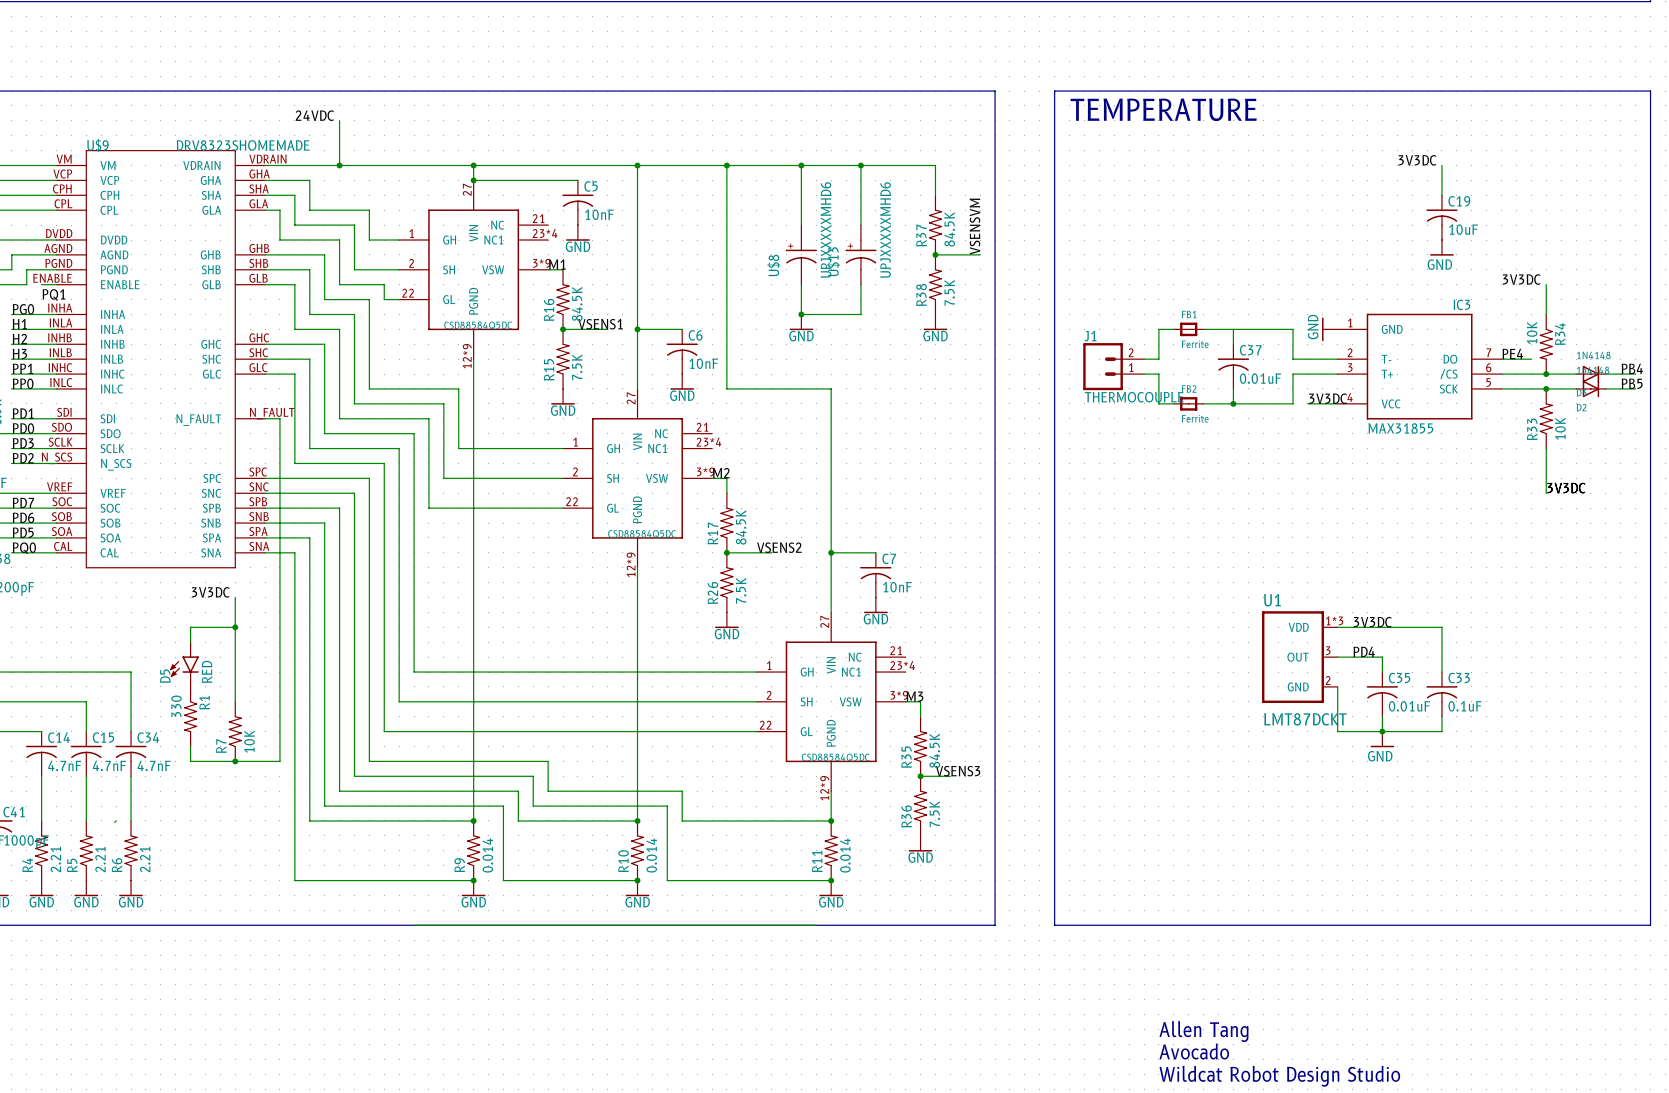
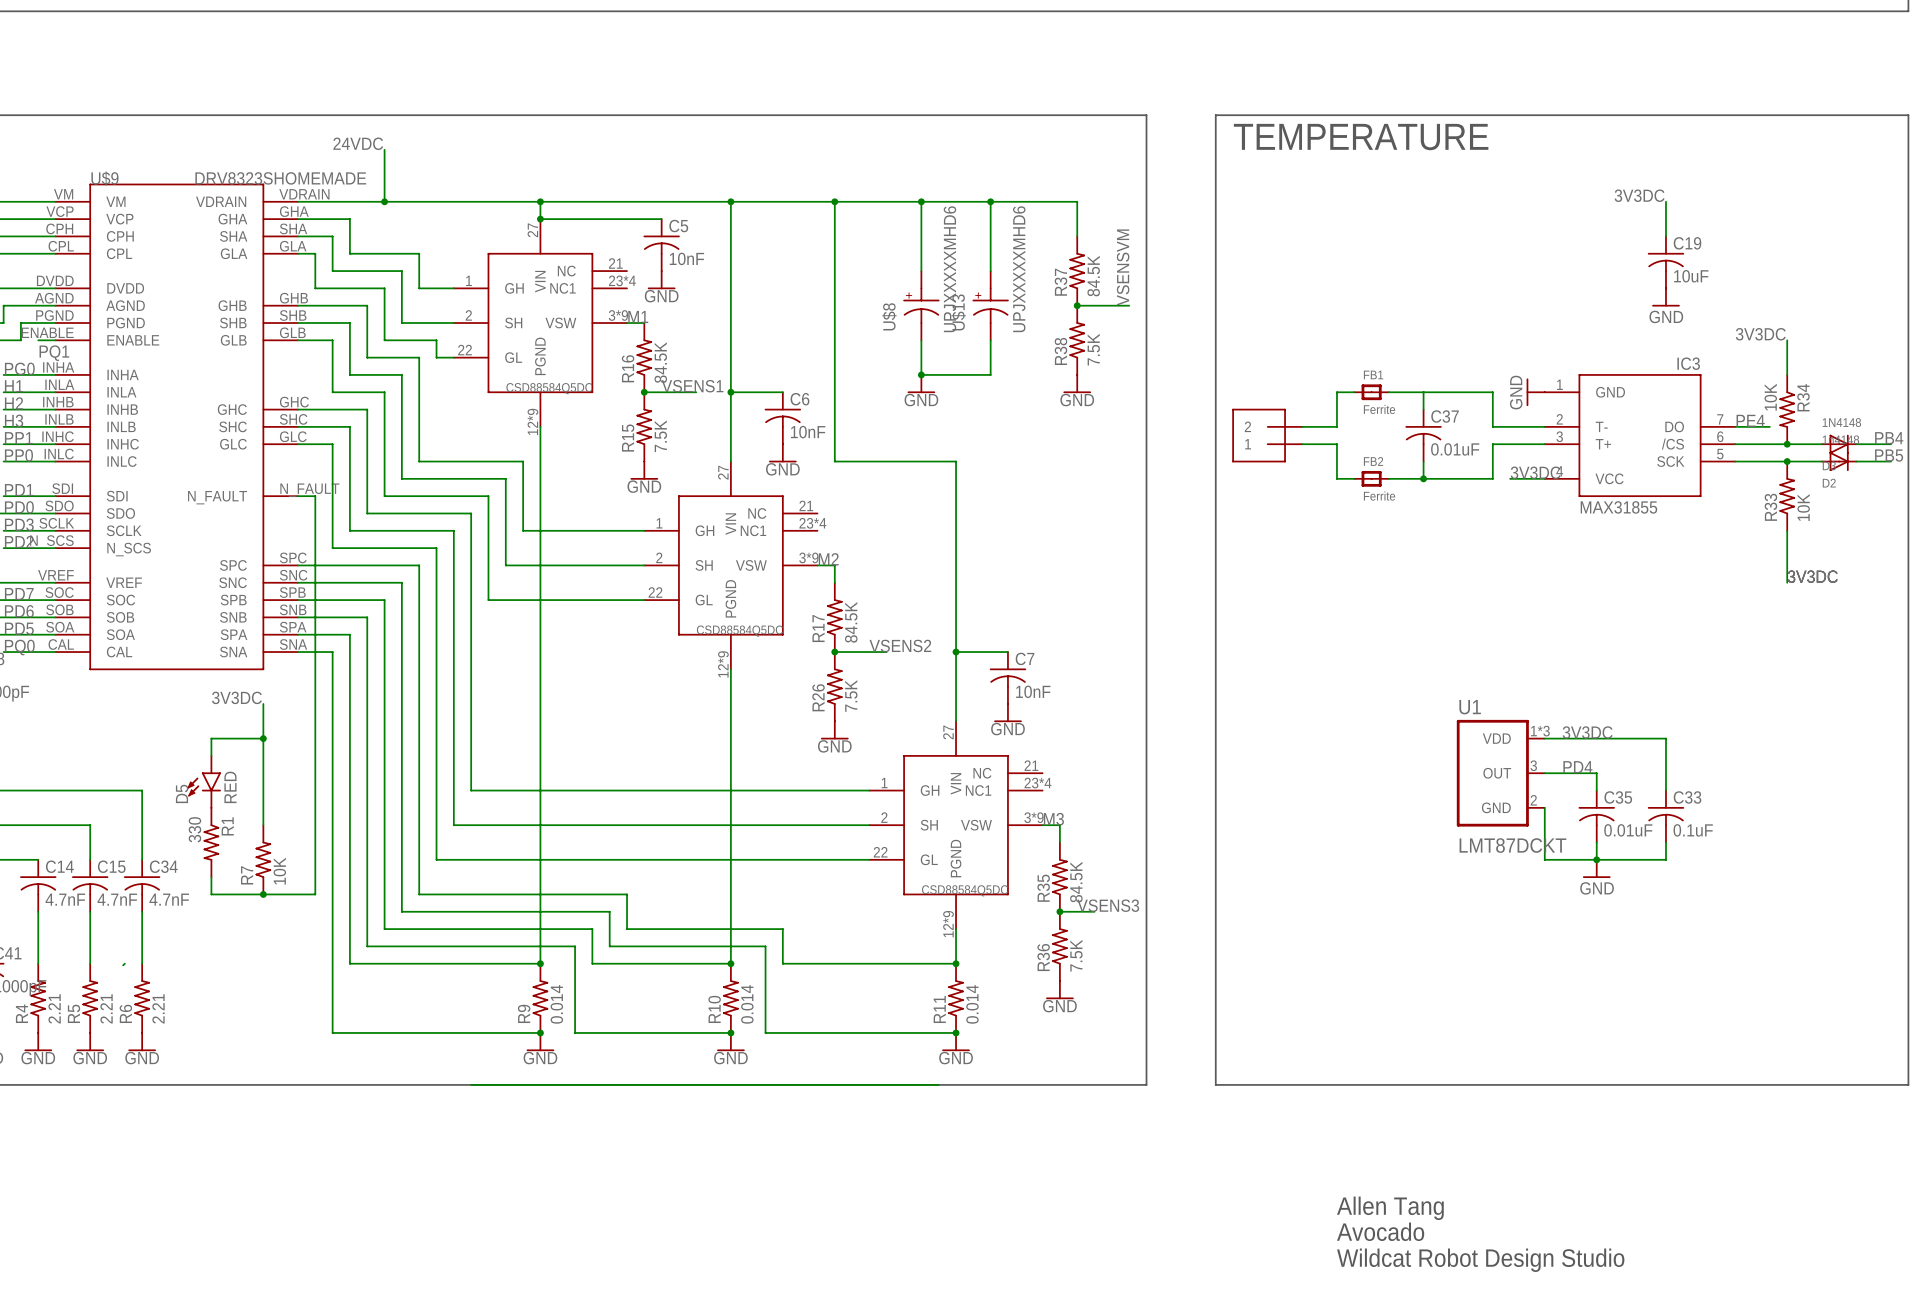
part: none -> (1267, 435)
J1: THERMOCOUPLE (1113, 366) -> none

